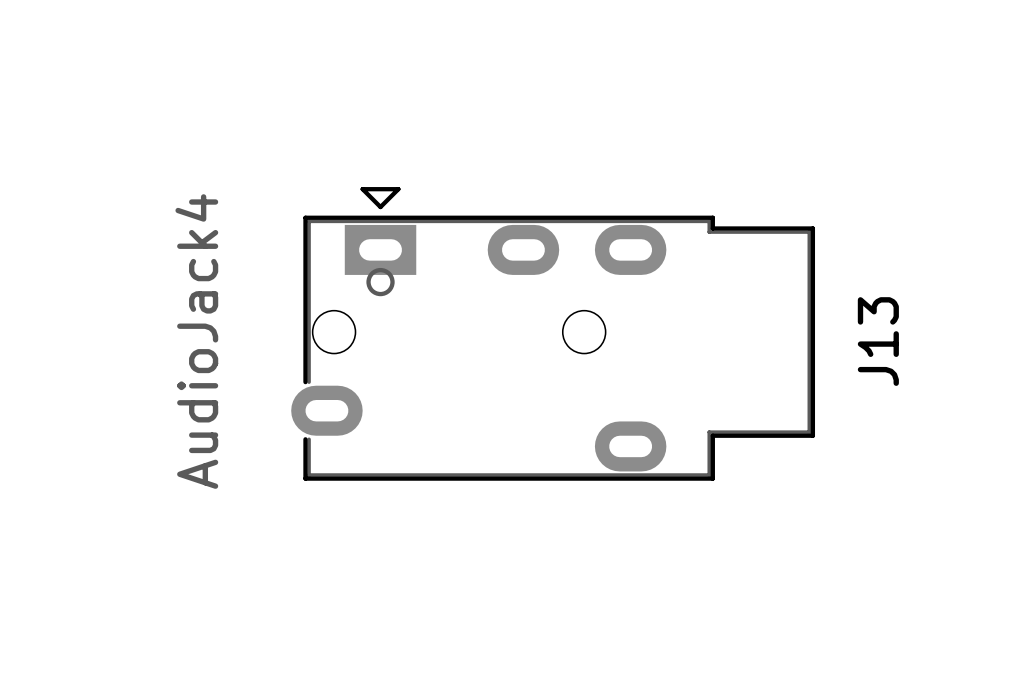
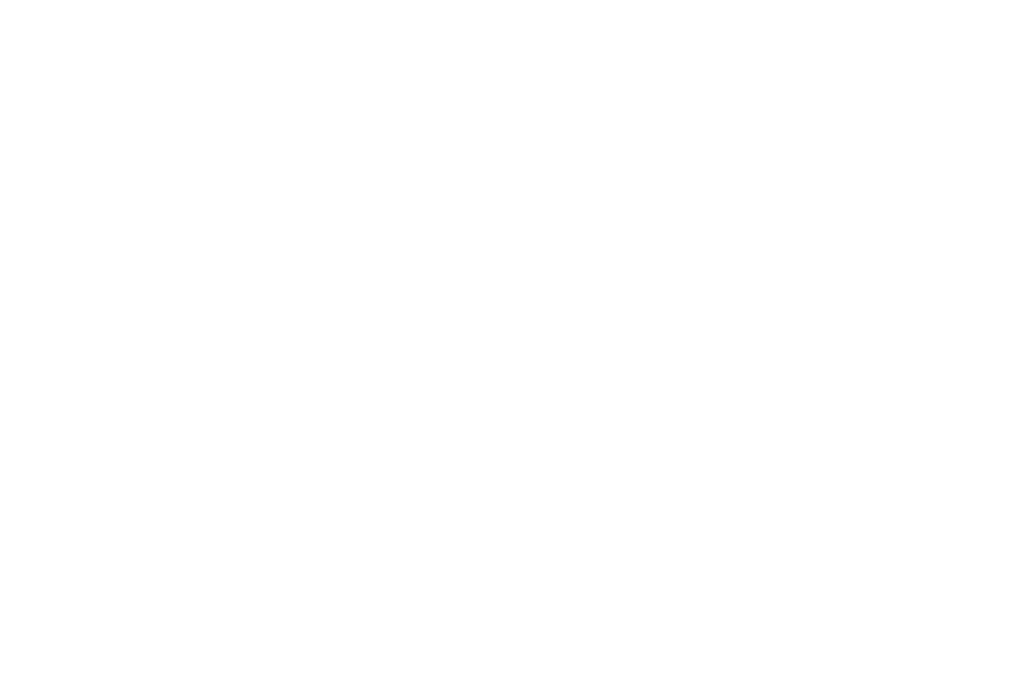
J13: AudioJack4 (553, 333) -> none

